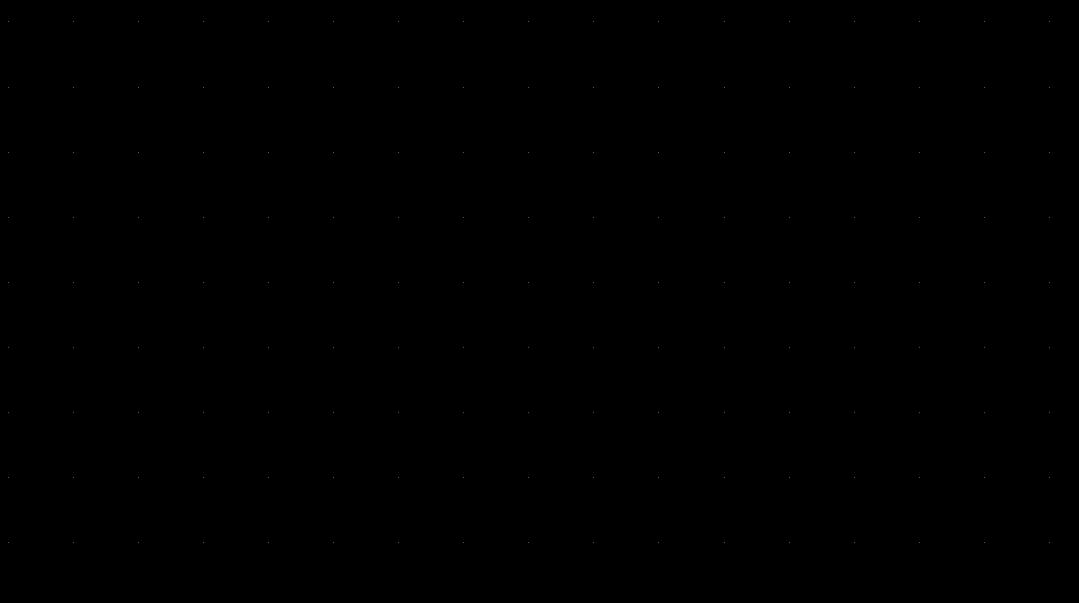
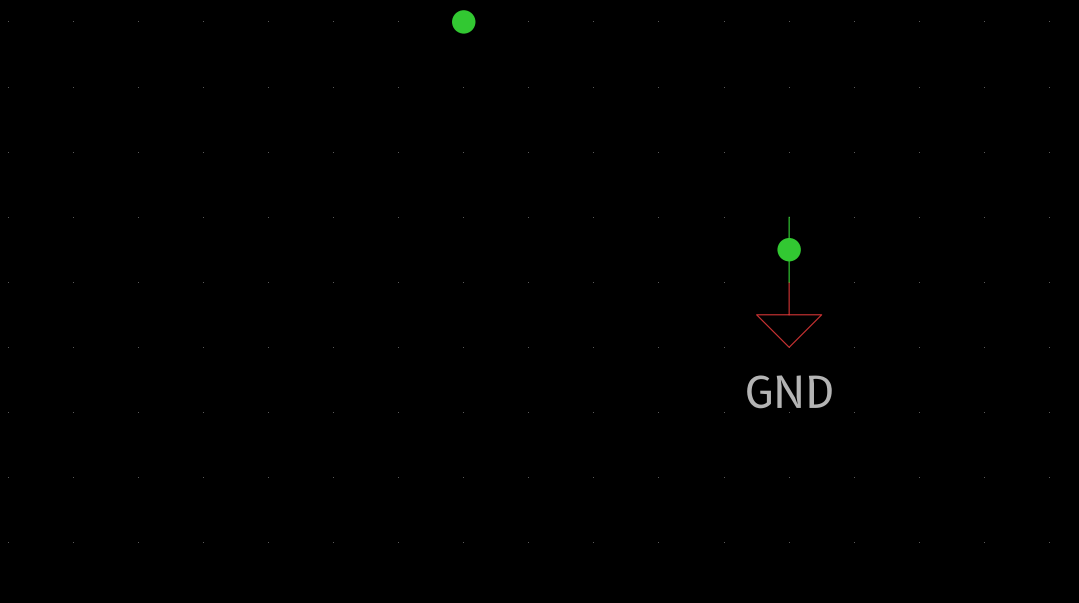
junction: none -> (463, 21)
wire: none -> (789, 217) (789, 282)
junction: none -> (789, 249)
power symbol: none -> GND (789, 314)

